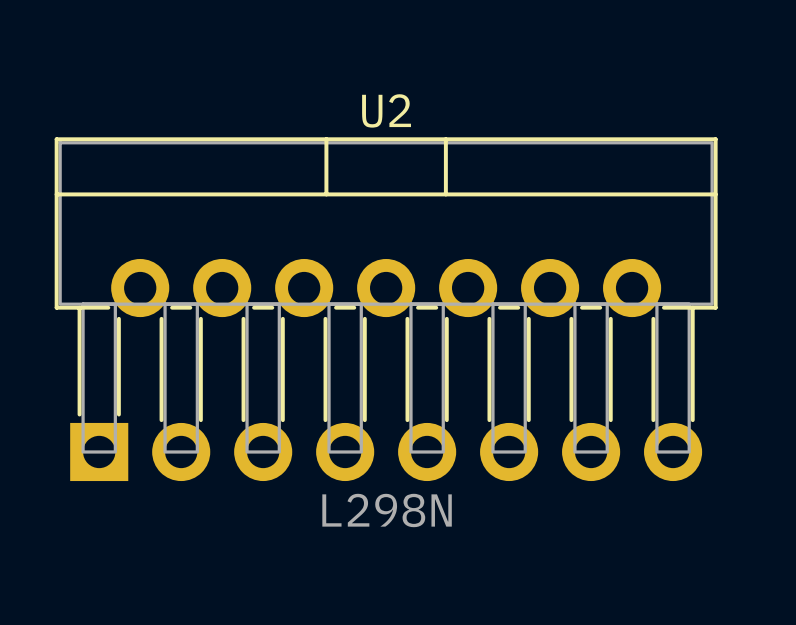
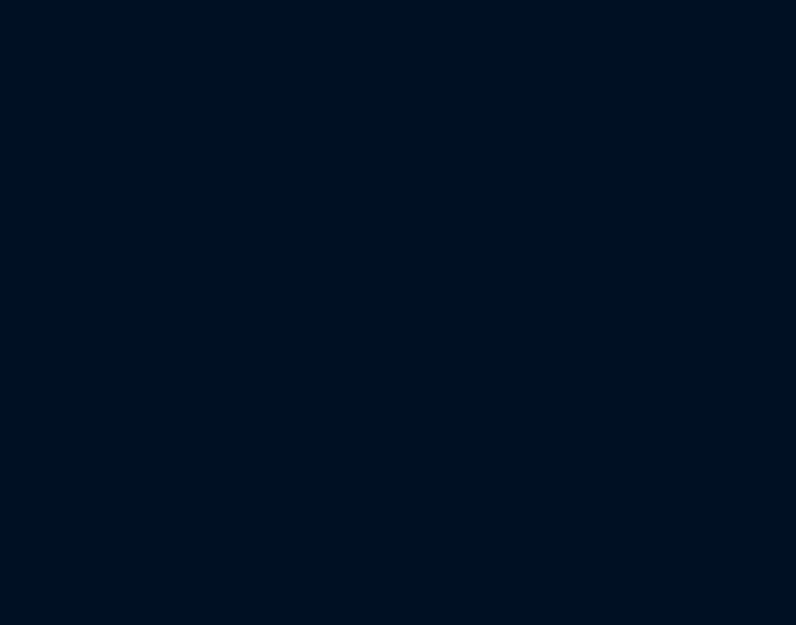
U2: L298N (386, 309) -> none

